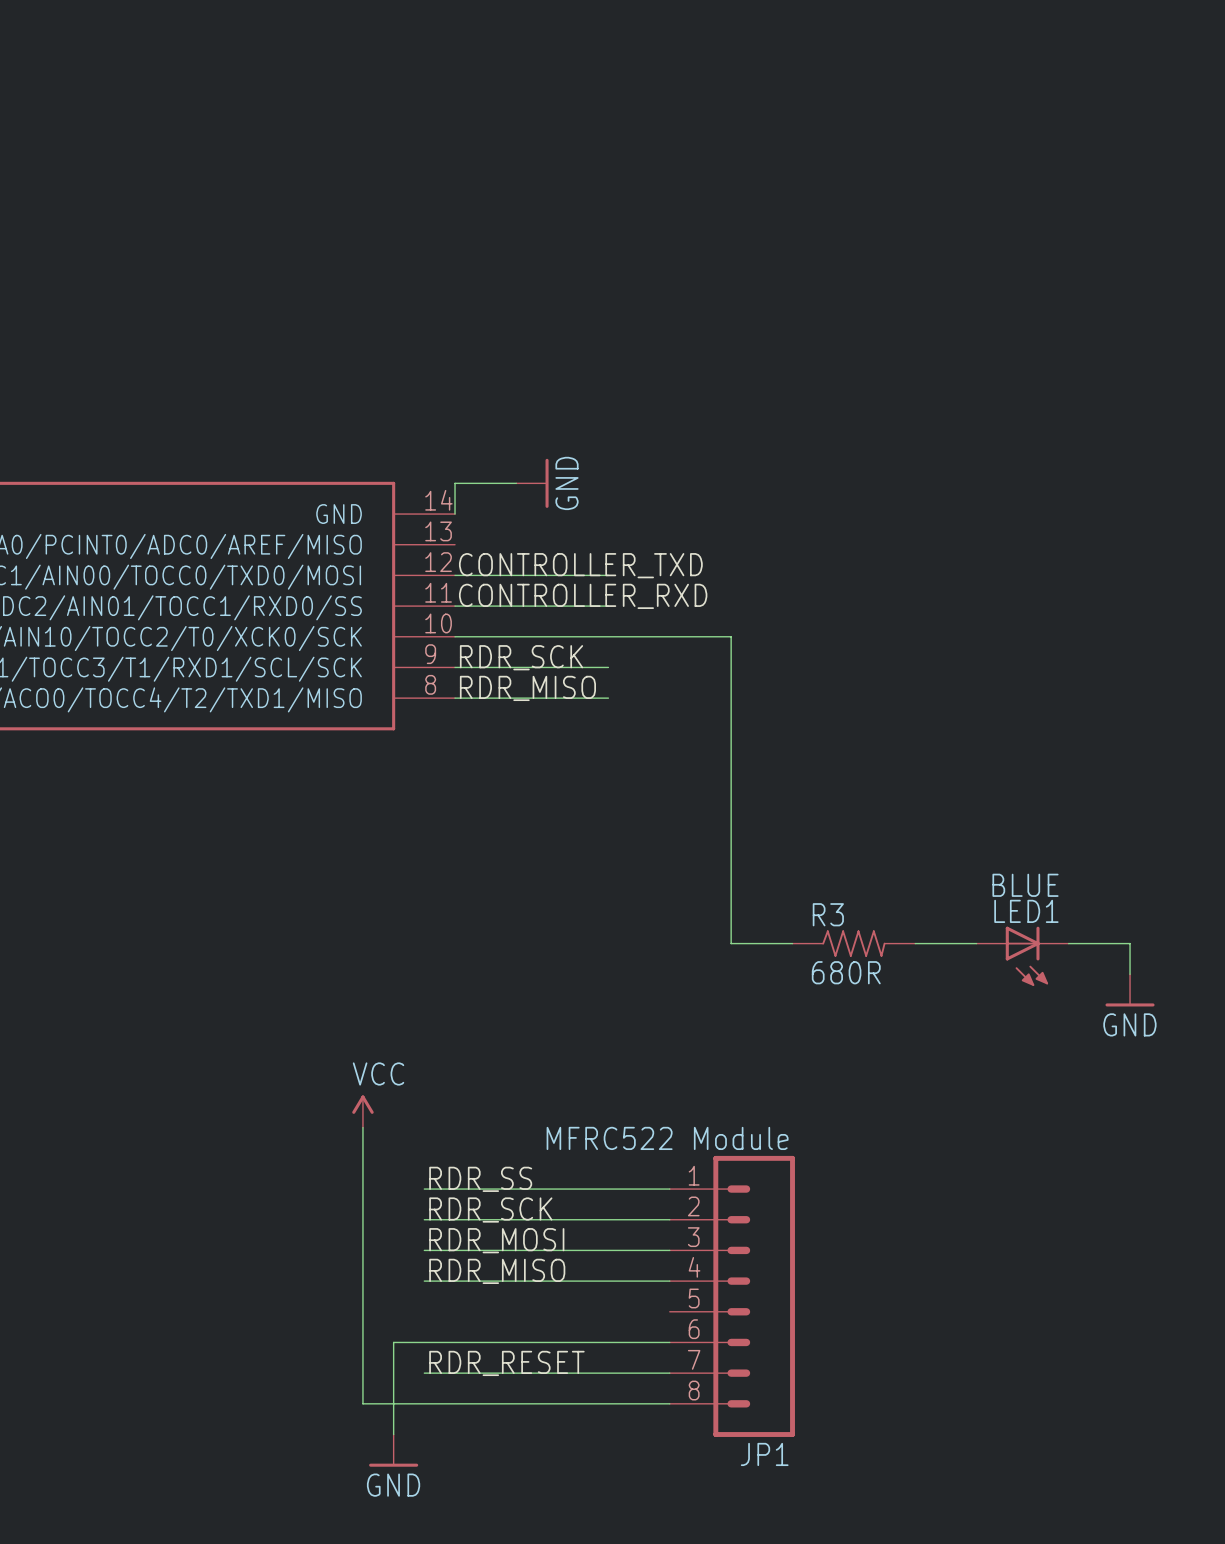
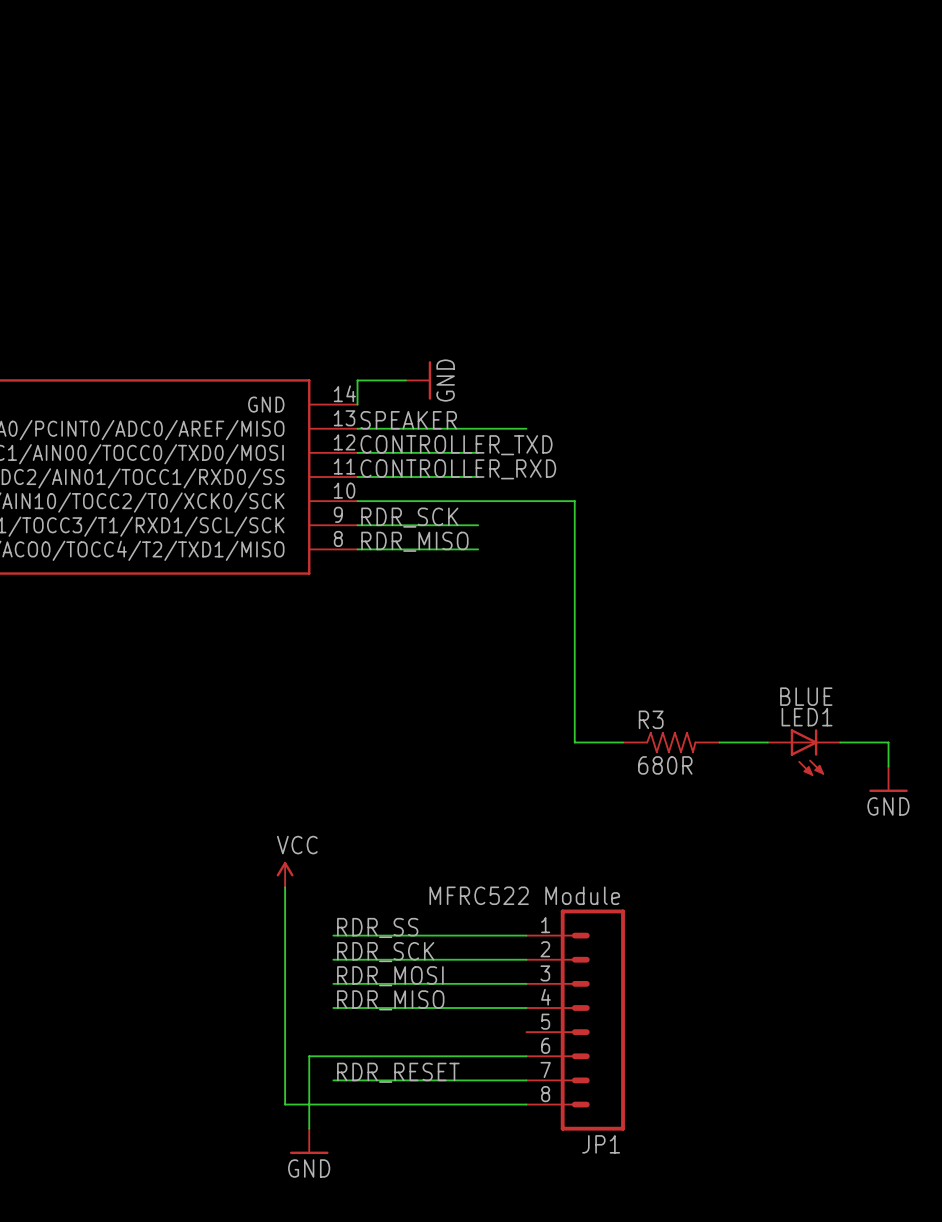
label: none -> SPEAKER (408, 420)
wire: none -> (357, 428) (526, 428)

